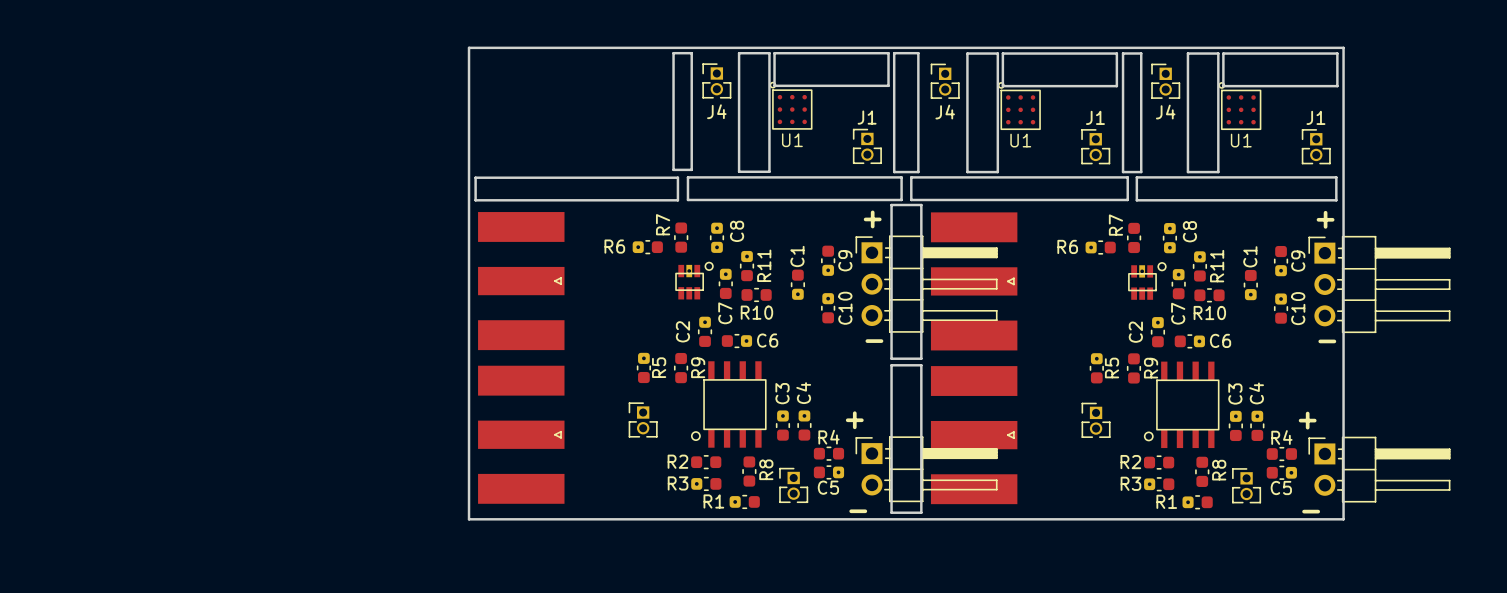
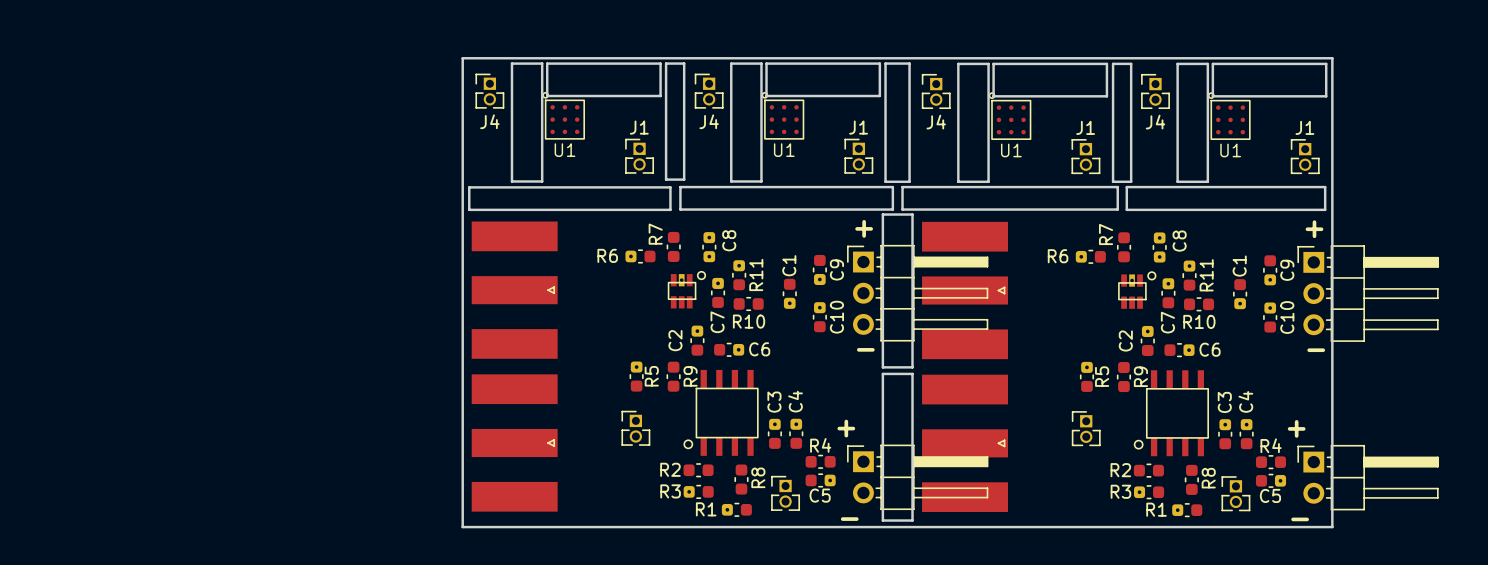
board edge: none -> (511, 63) (542, 63) (542, 181) (511, 181) (511, 63)
board edge: none -> (547, 63) (660, 63) (660, 96) (547, 96) (547, 63)
J4: none -> (489, 91)
U1: none -> (563, 115)
J1: none -> (639, 156)

